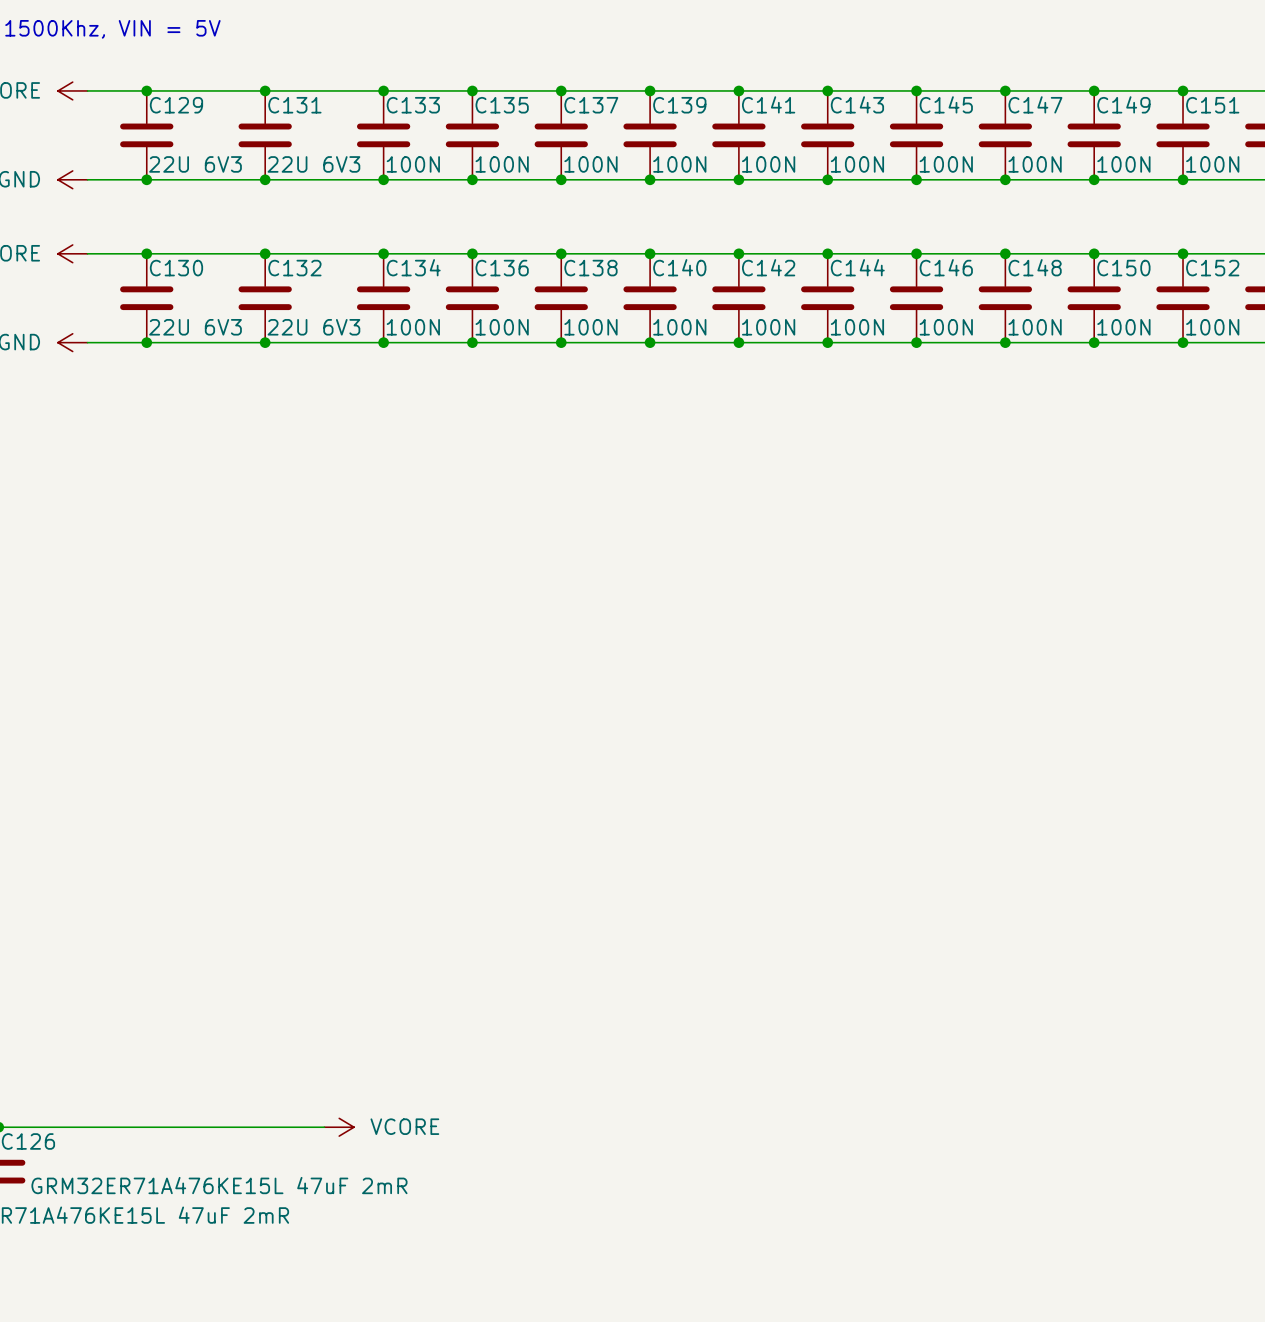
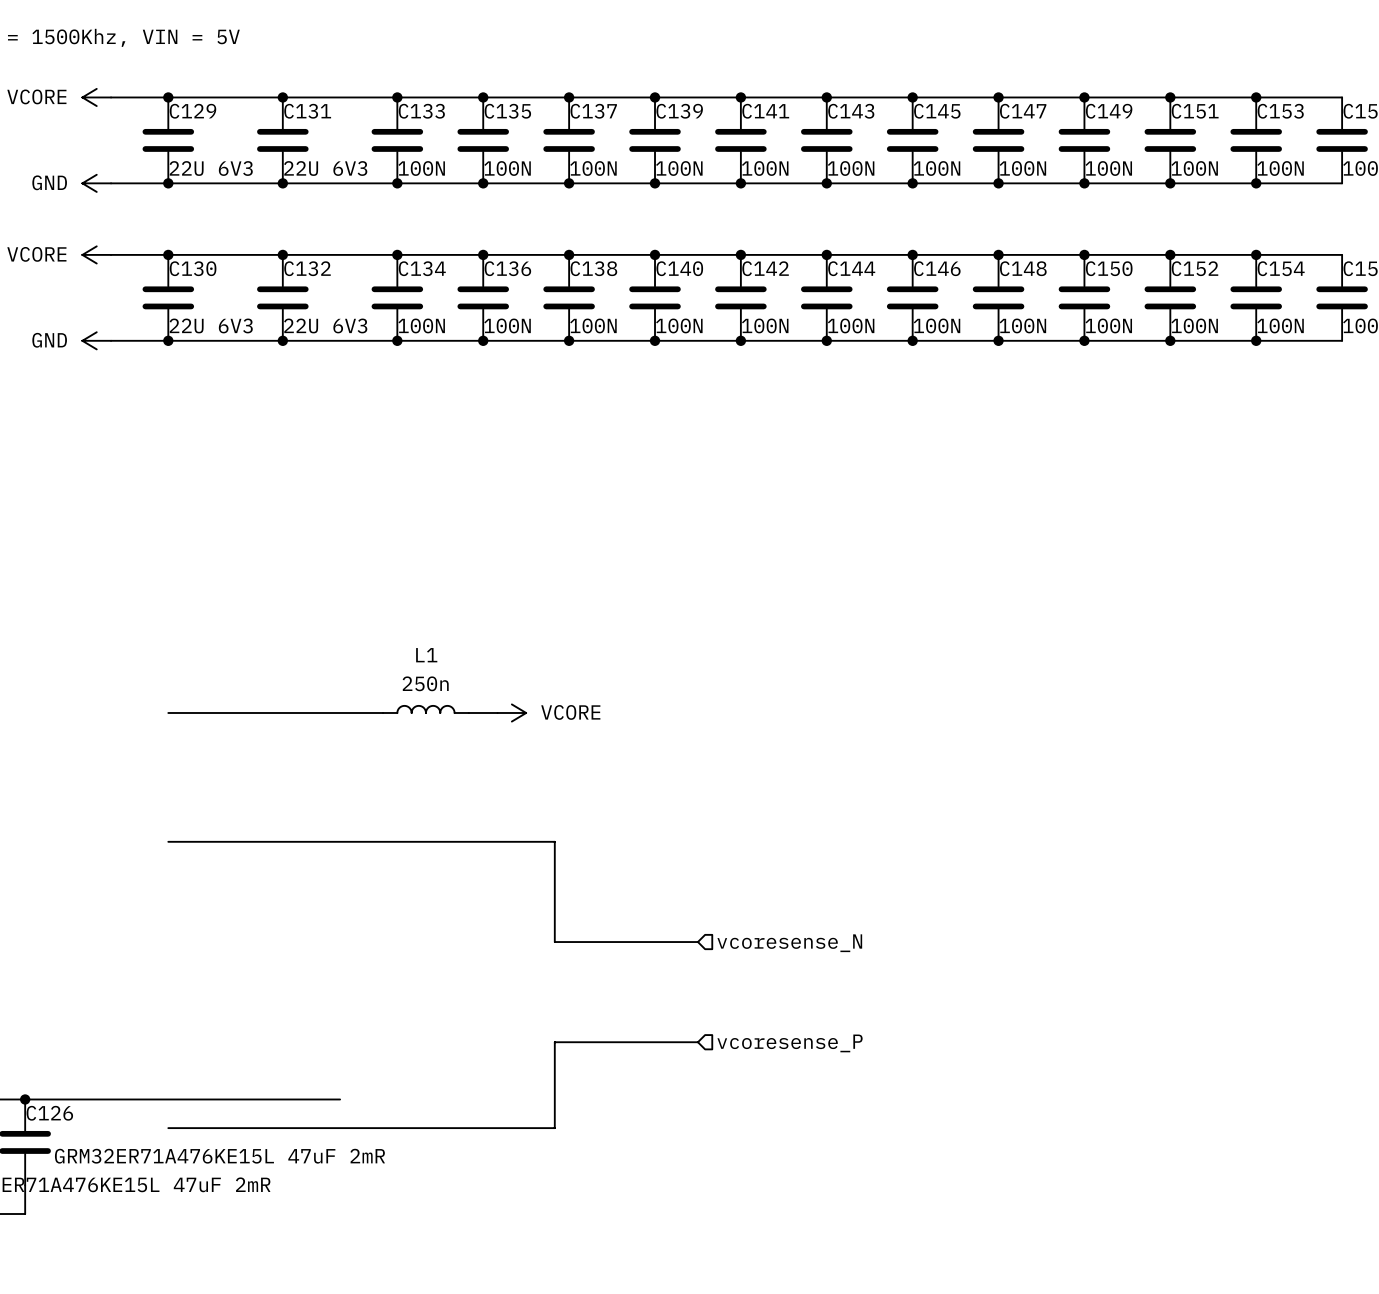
L1: none -> 250n (425, 709)
wire: none -> (168, 712) (383, 712)
wire: none -> (468, 712) (497, 712)
power symbol: none -> VCORE (511, 712)
wire: none -> (168, 841) (554, 841) (554, 942) (697, 942)
hierarchical label: none -> vcoresense_N (789, 943)
wire: none -> (697, 1042) (554, 1042) (554, 1128) (168, 1128)
hierarchical label: none -> vcoresense_P (790, 1043)
power symbol: VCORE (339, 1127) -> none

